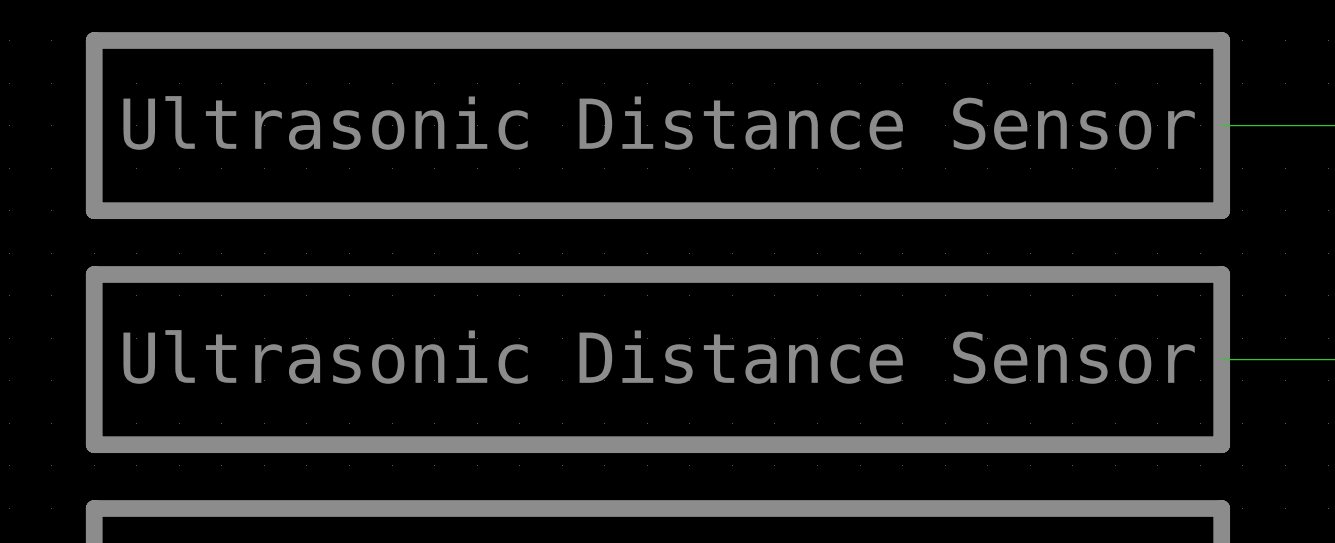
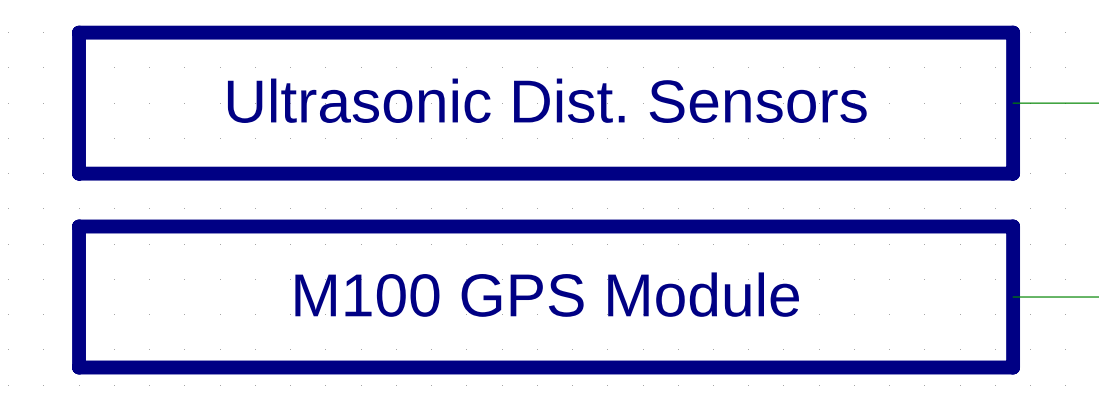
text: Ultrasonic Distance Sensor (659, 122) -> Ultrasonic Dist. Sensors (547, 100)
text: Ultrasonic Distance Sensor (659, 356) -> M100 GPS Module (547, 294)

